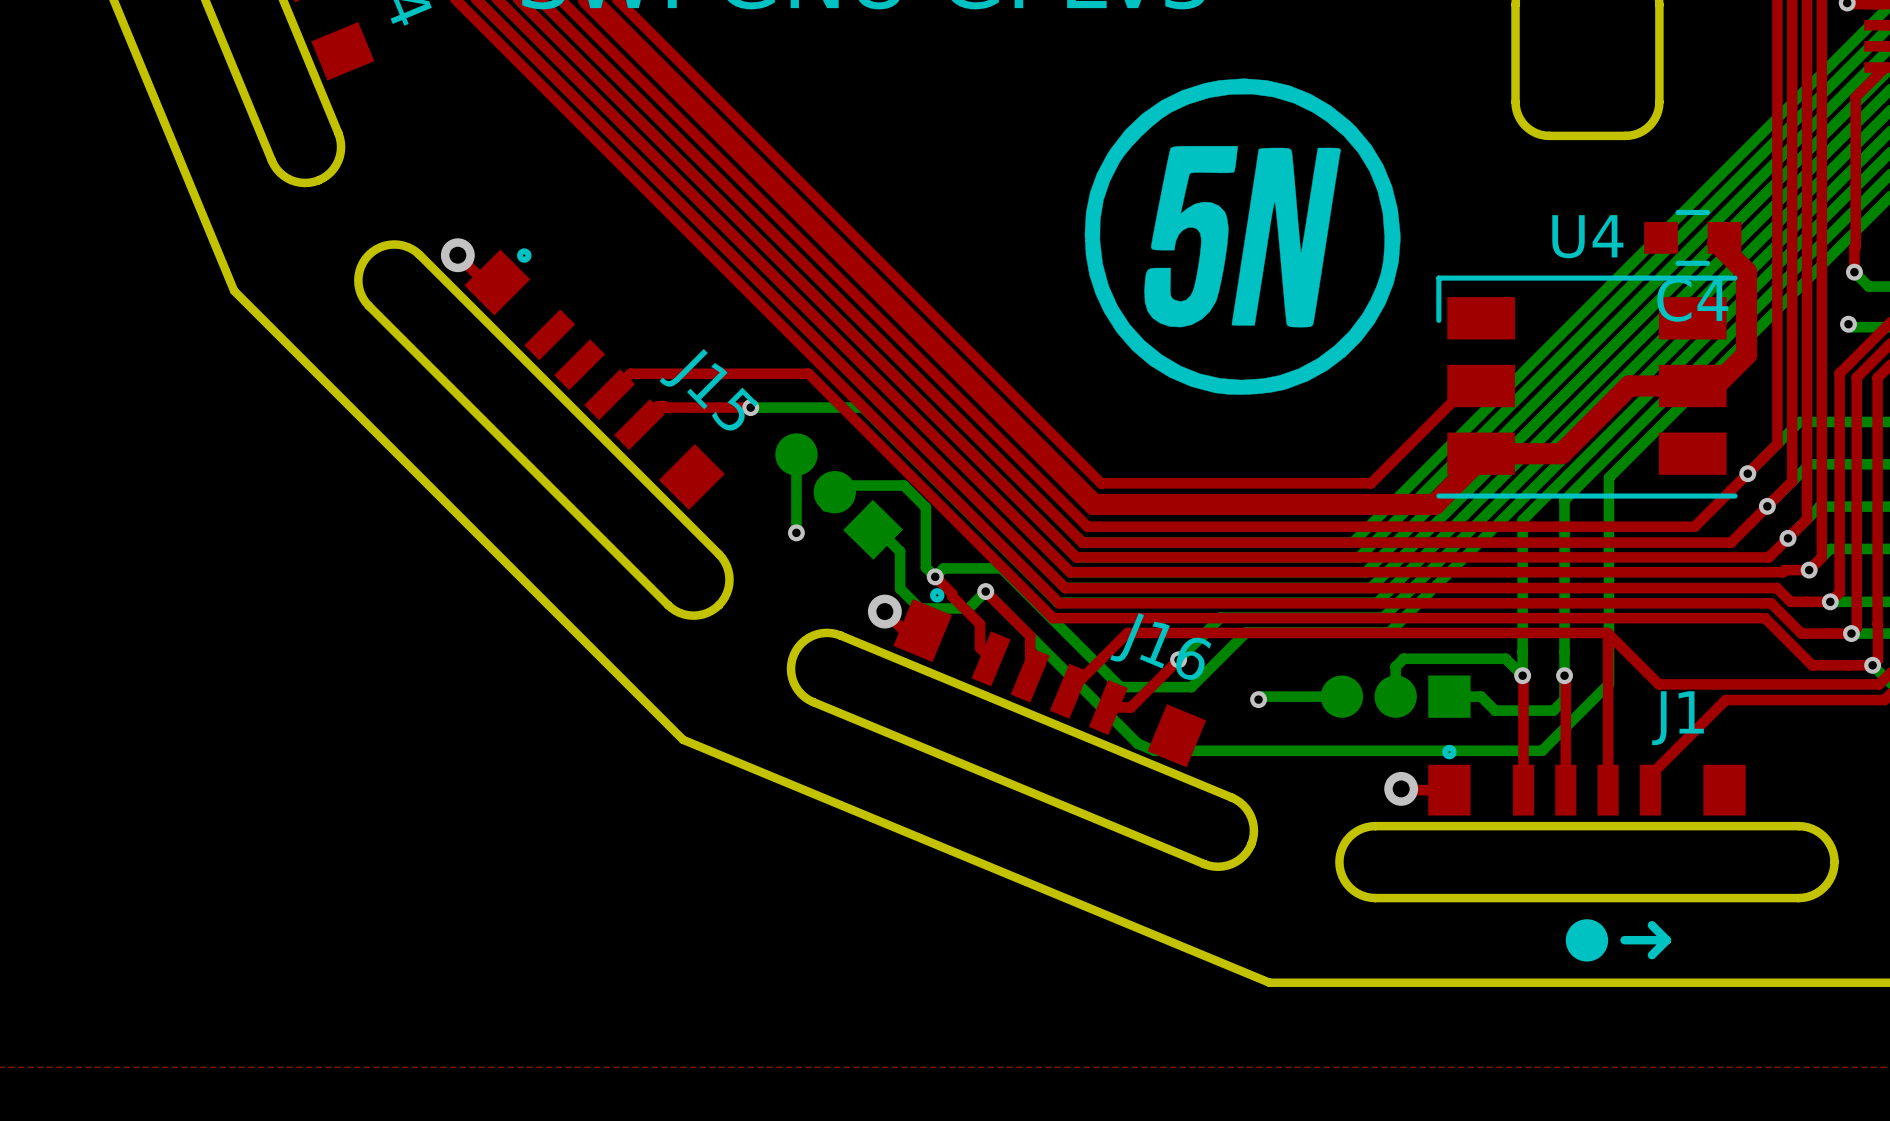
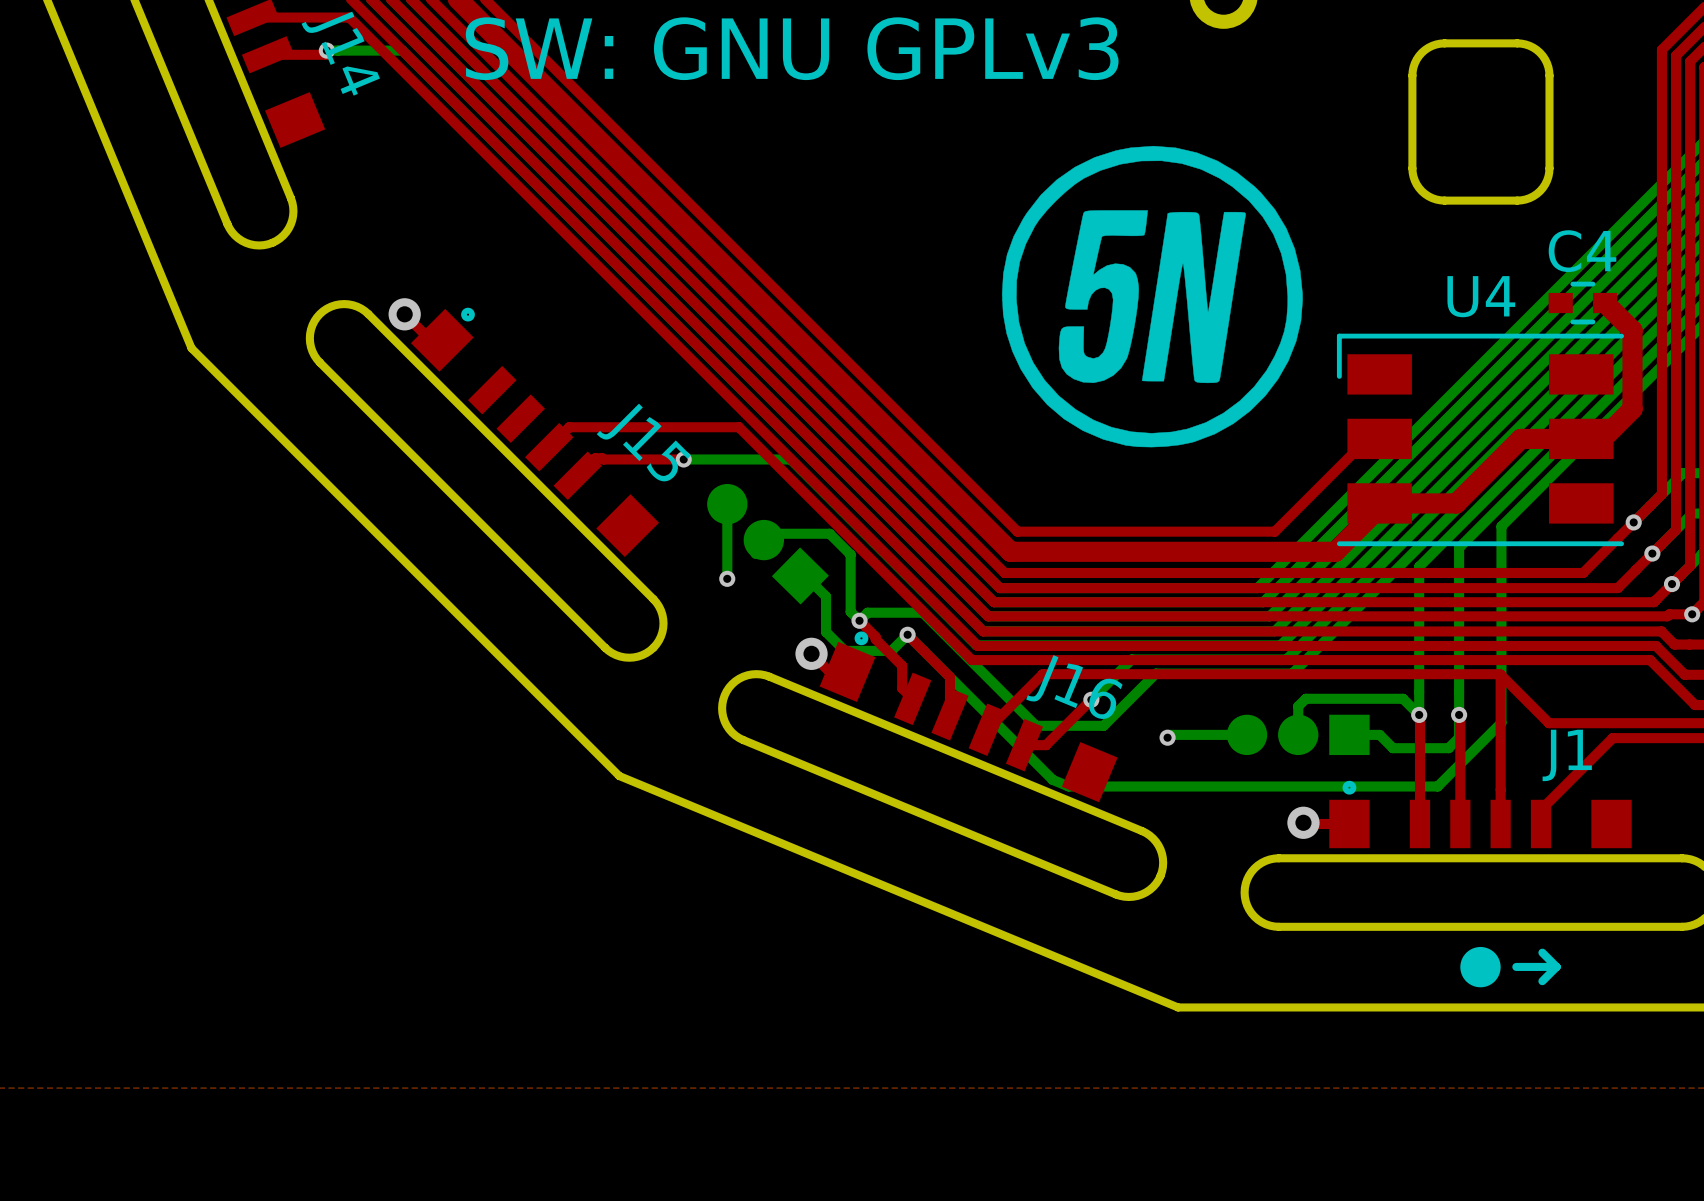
C4 footprint: [1644, 209, 1742, 266] -> [1548, 281, 1618, 325]
C4 name position: C4 (1692, 299) -> C4 (1582, 251)

